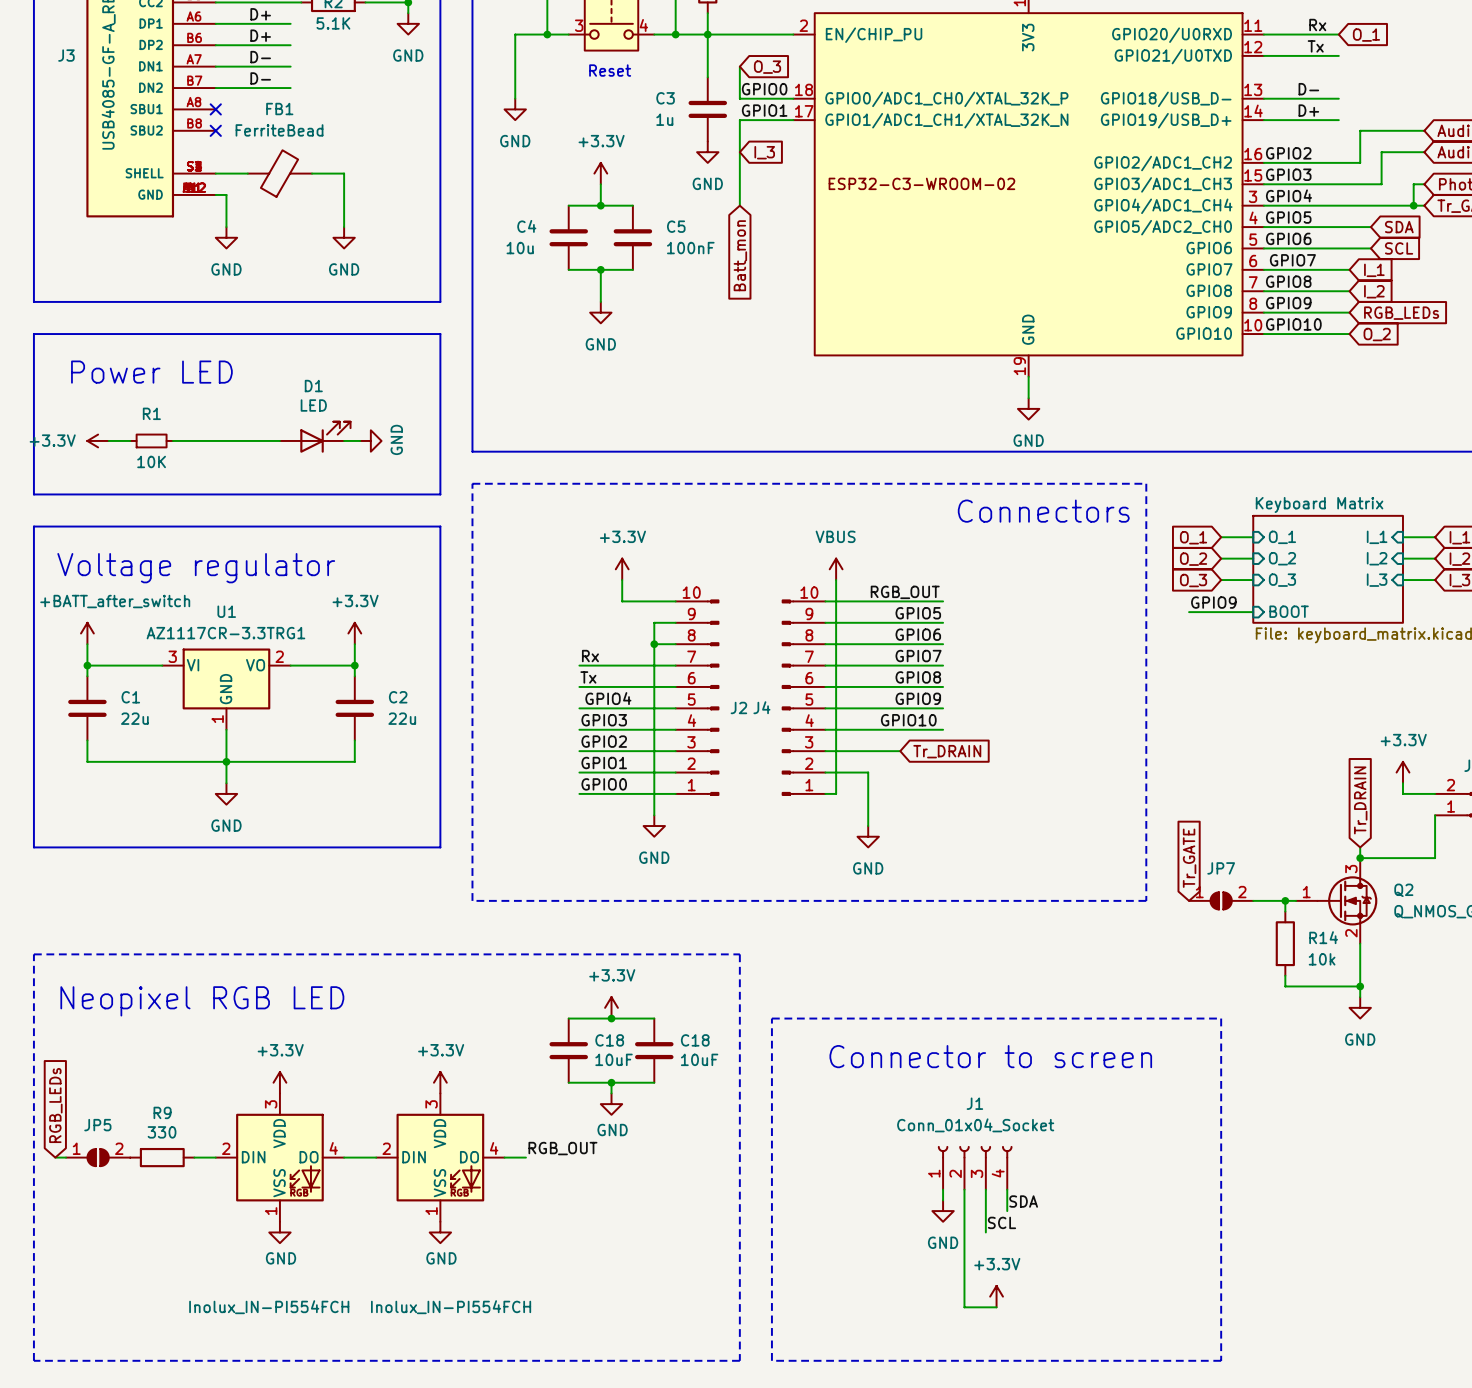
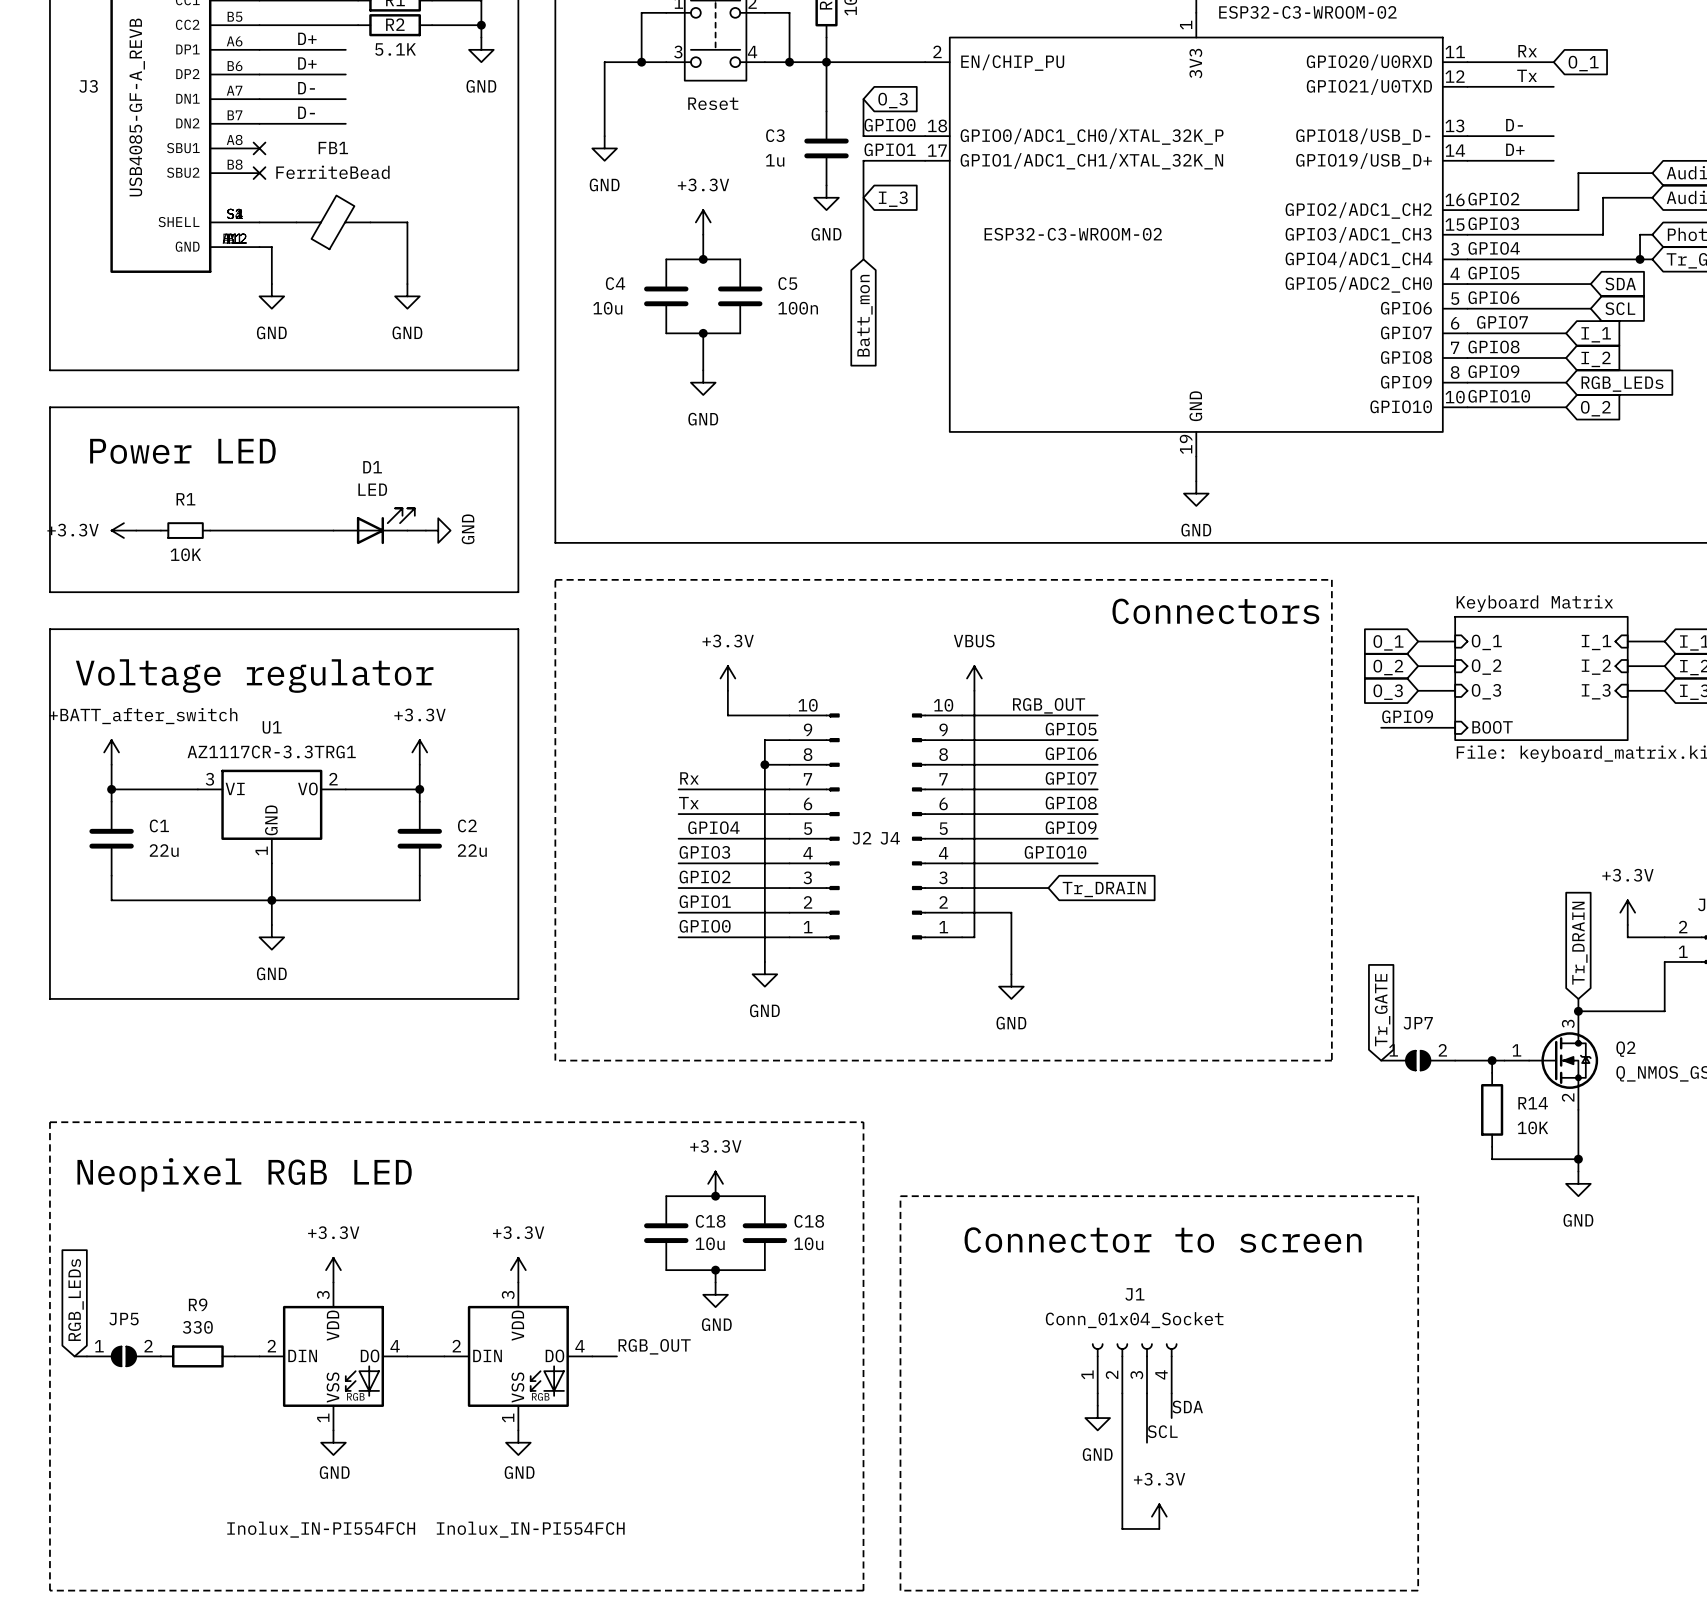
C5 value: 100nF (690, 248) -> 100n (798, 308)
R14 value: 10k (1322, 959) -> 10K (1532, 1127)
C18 value: 10uF (614, 1059) -> 10u (710, 1243)
C18 value: 10uF (699, 1059) -> 10u (808, 1243)

